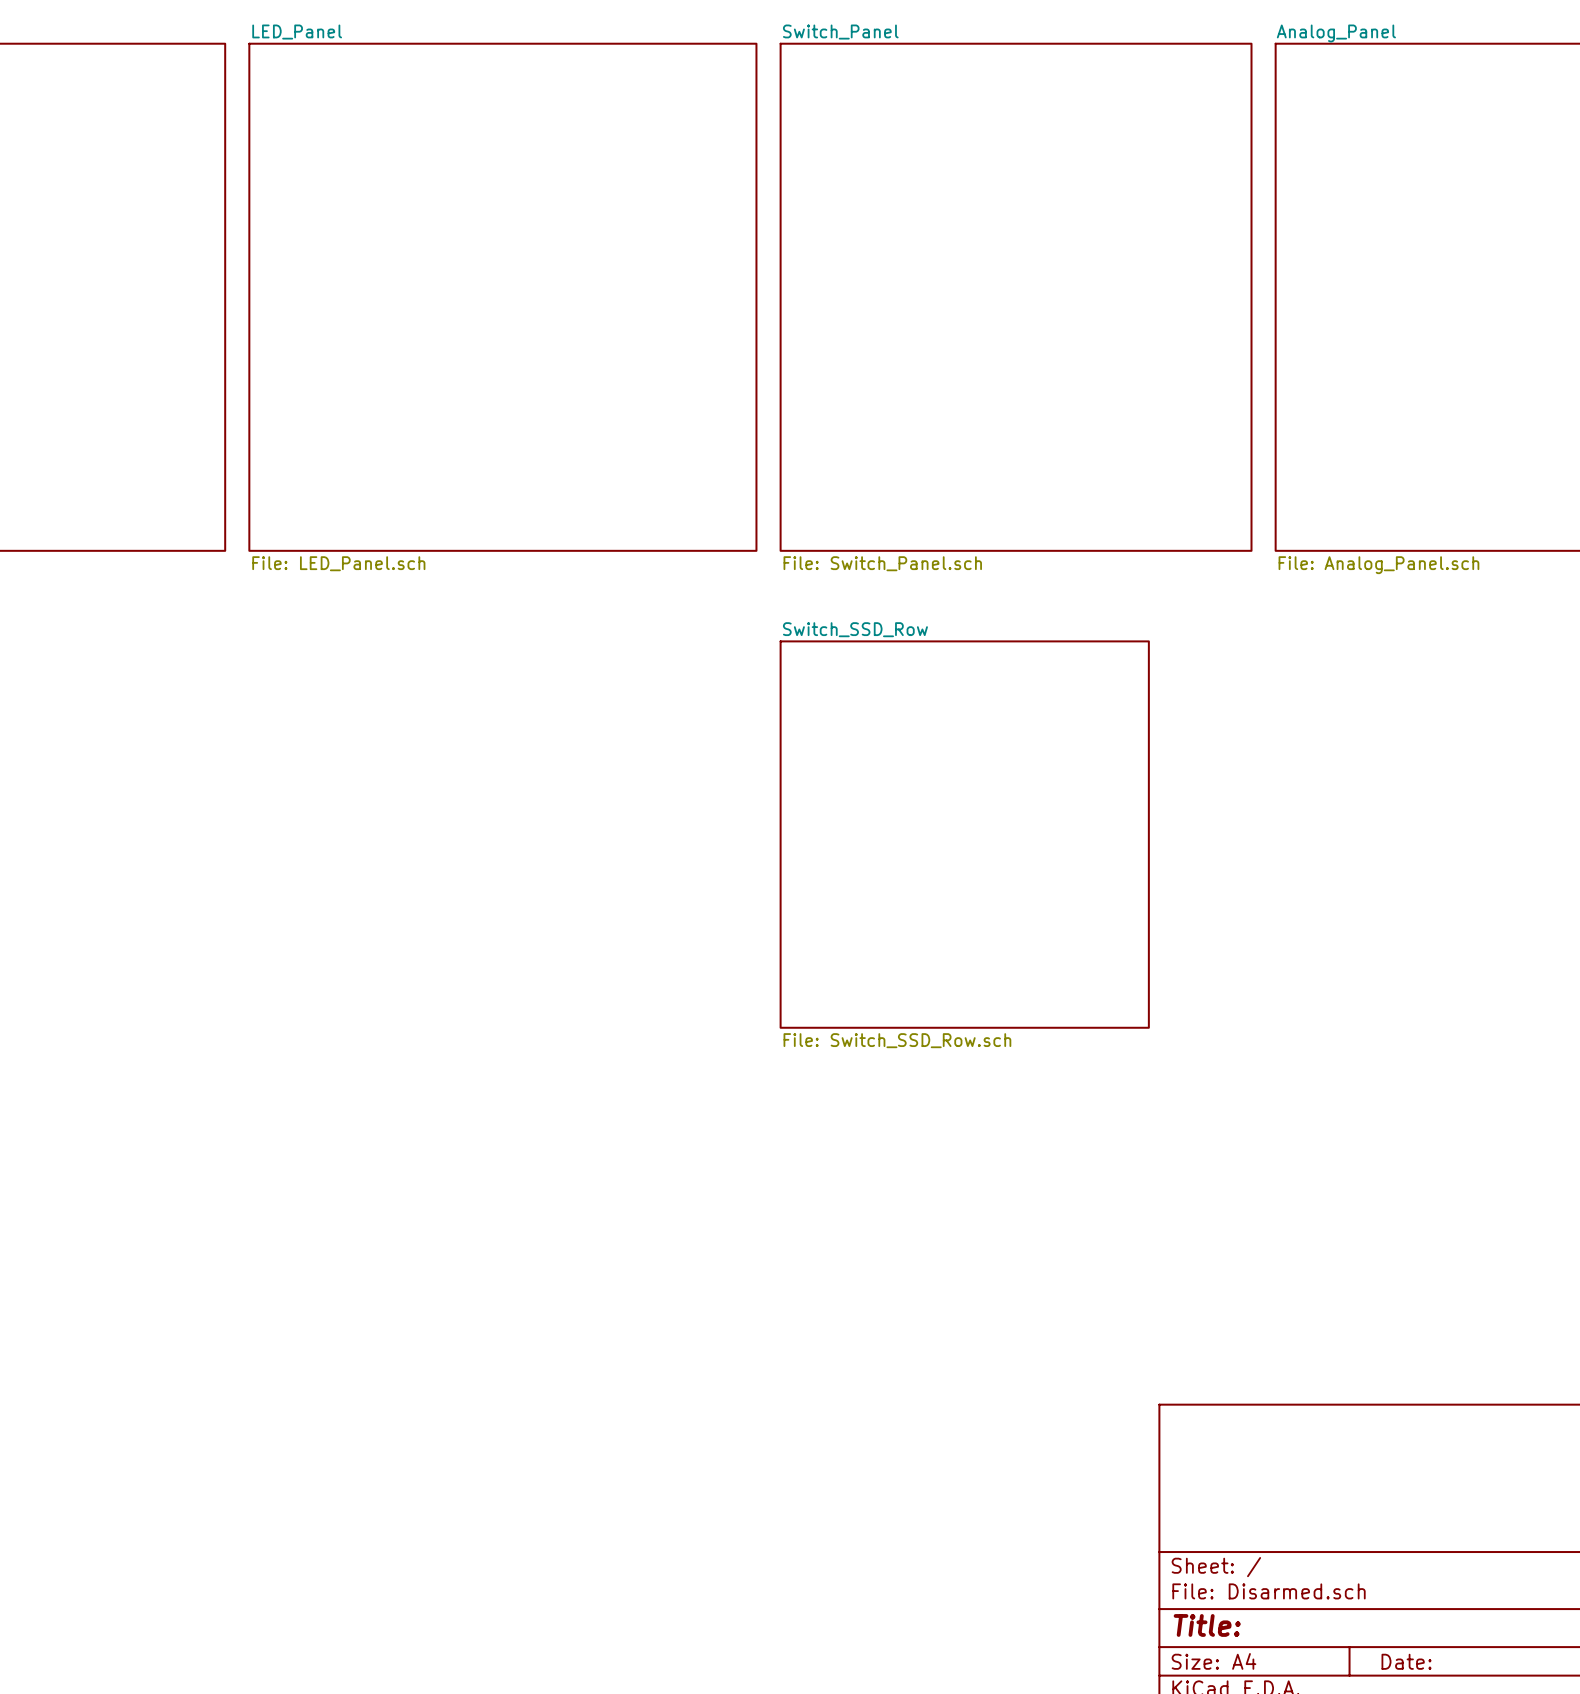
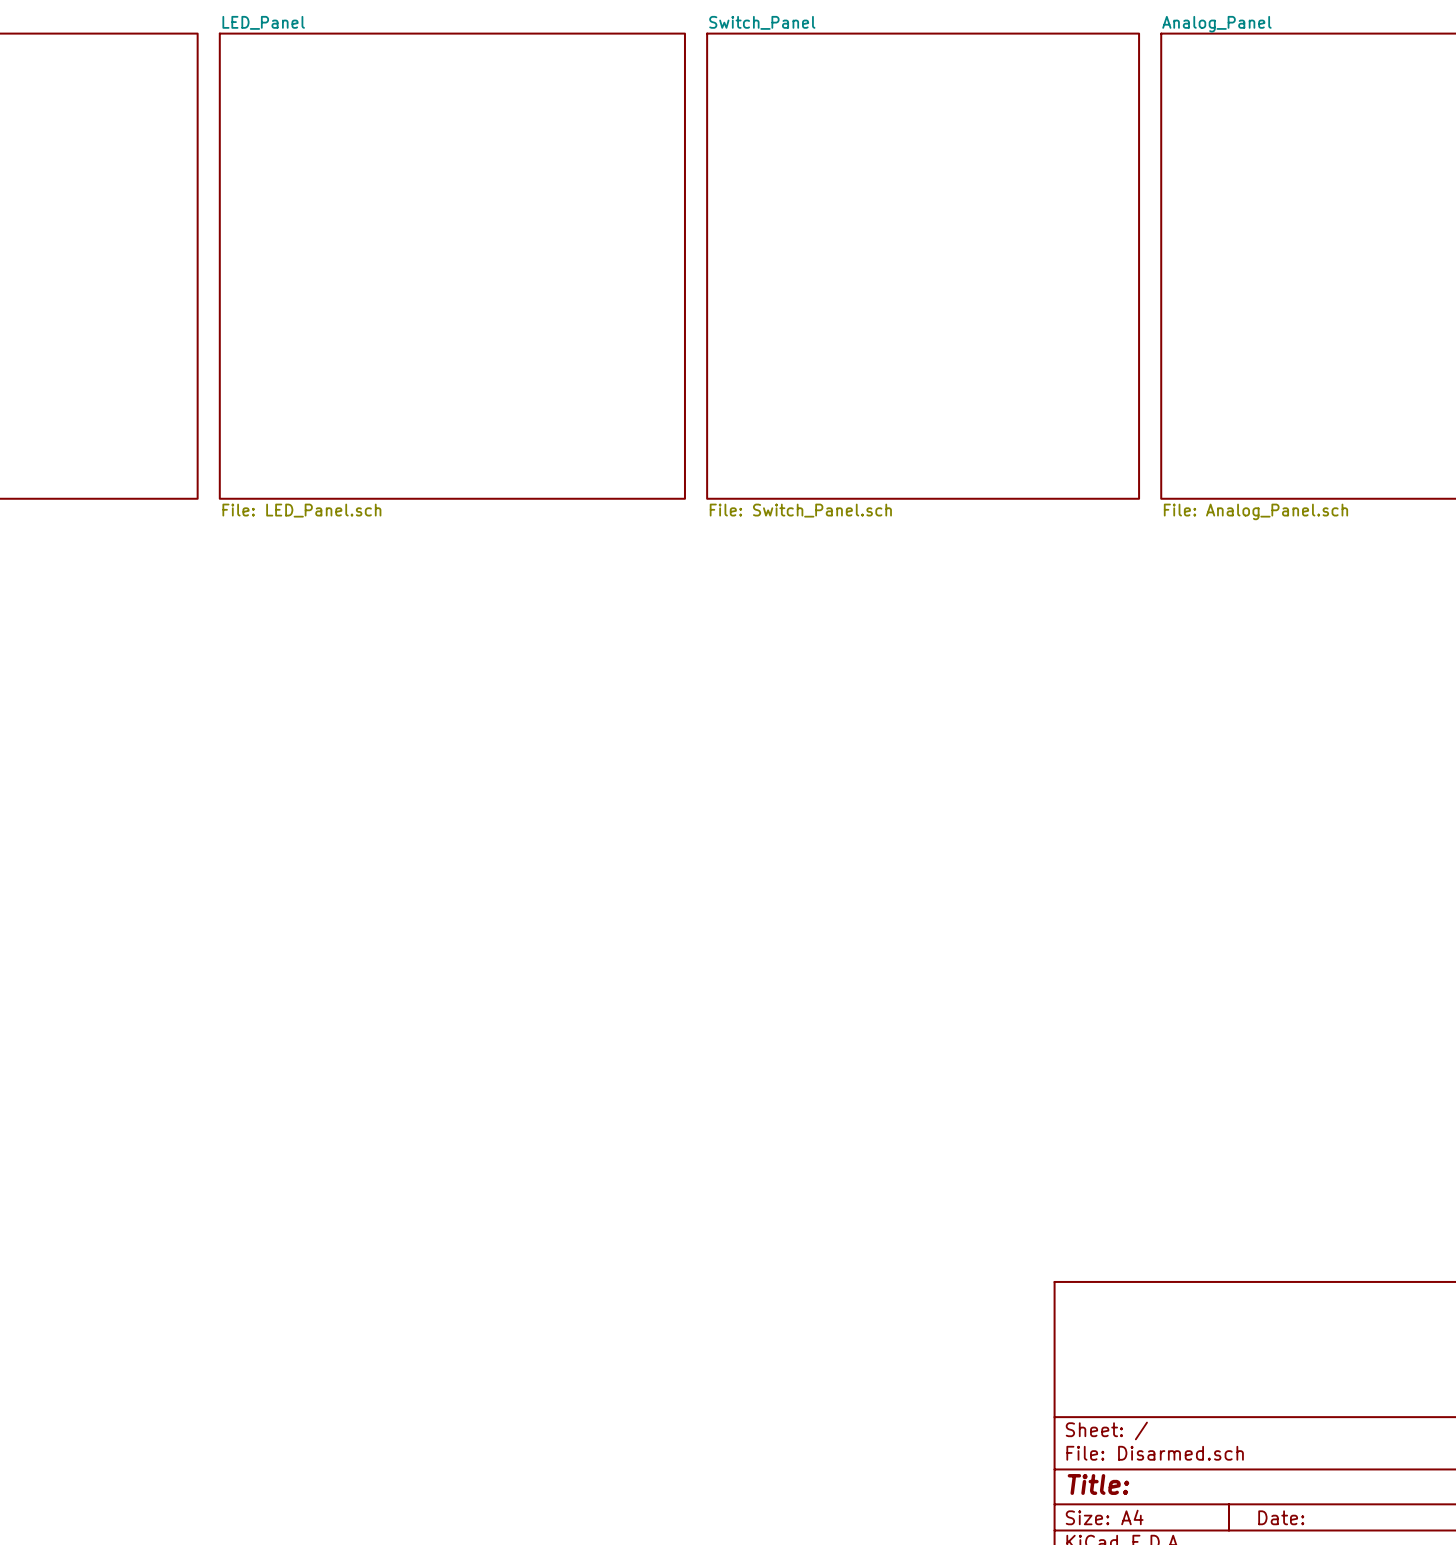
sheet Switch_SSD_Row: File: Switch_SSD_Row.sch (964, 834) -> none

